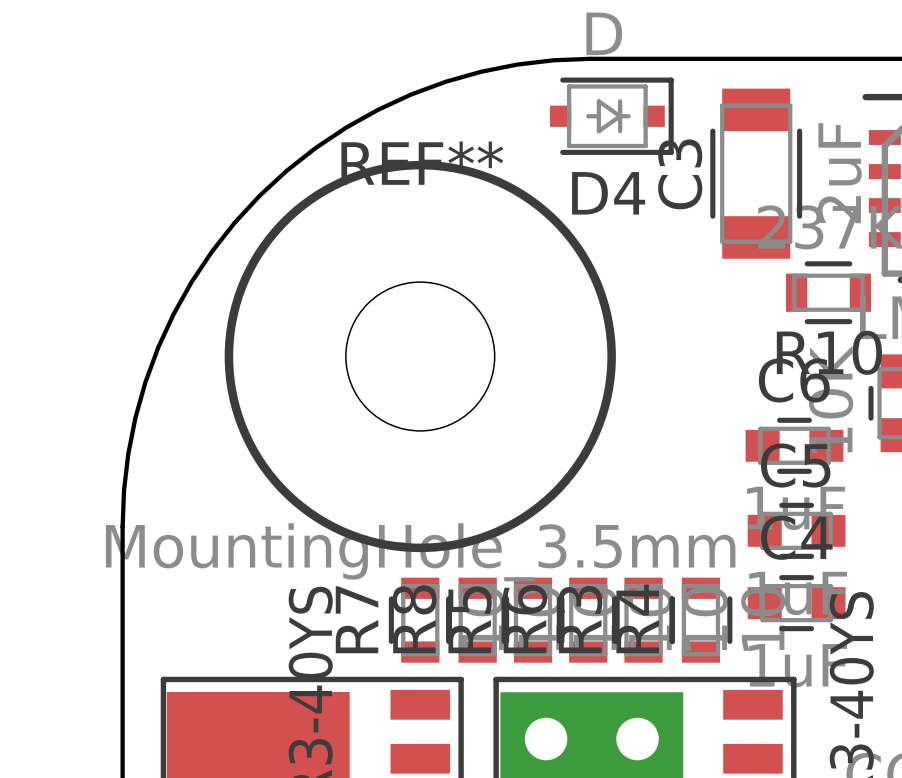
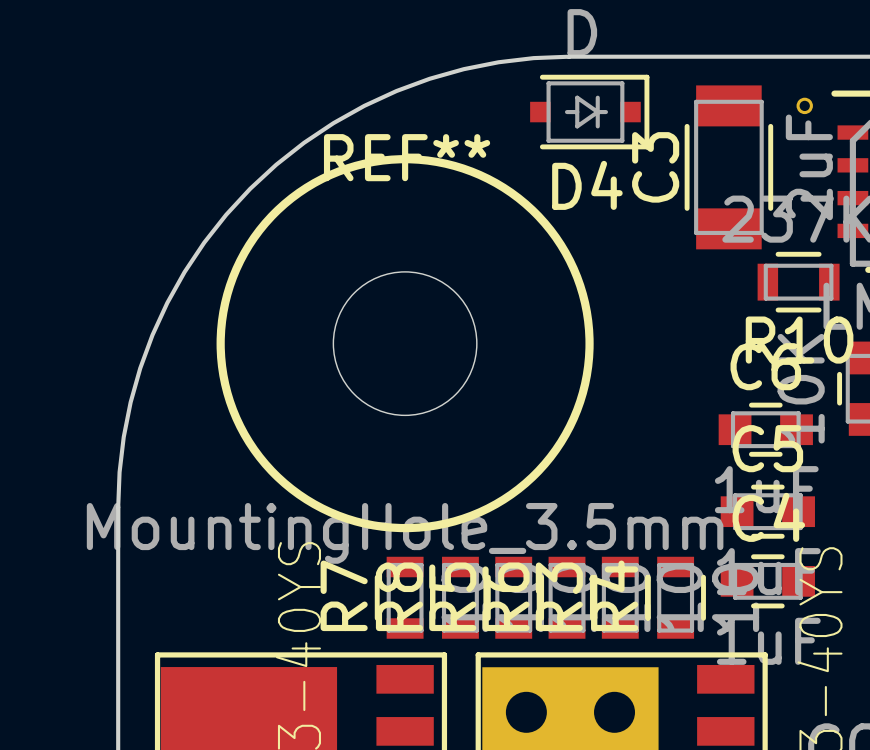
part: none -> (804, 105)

